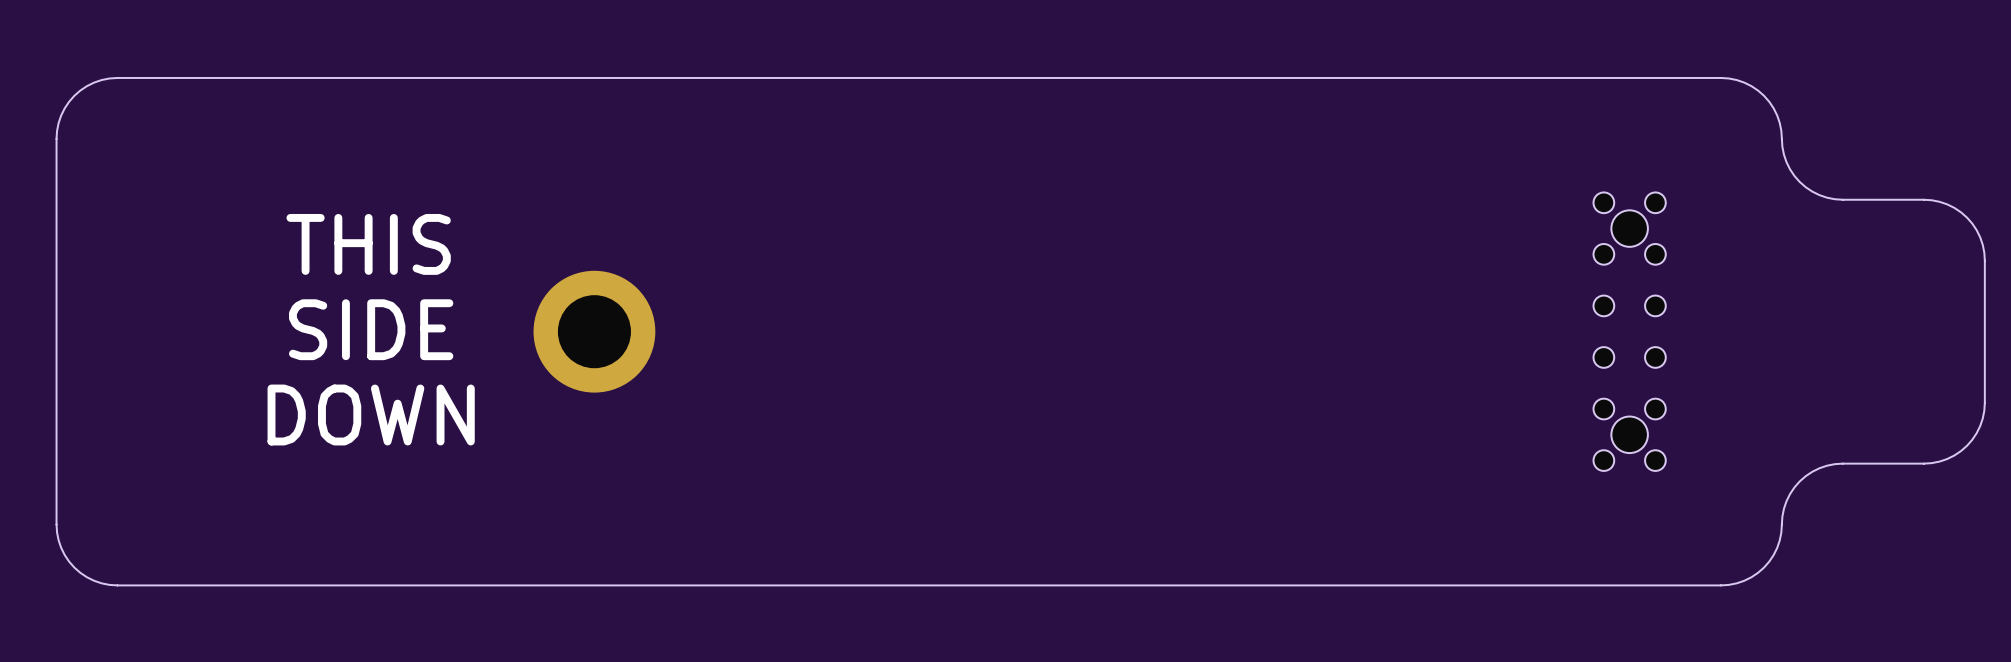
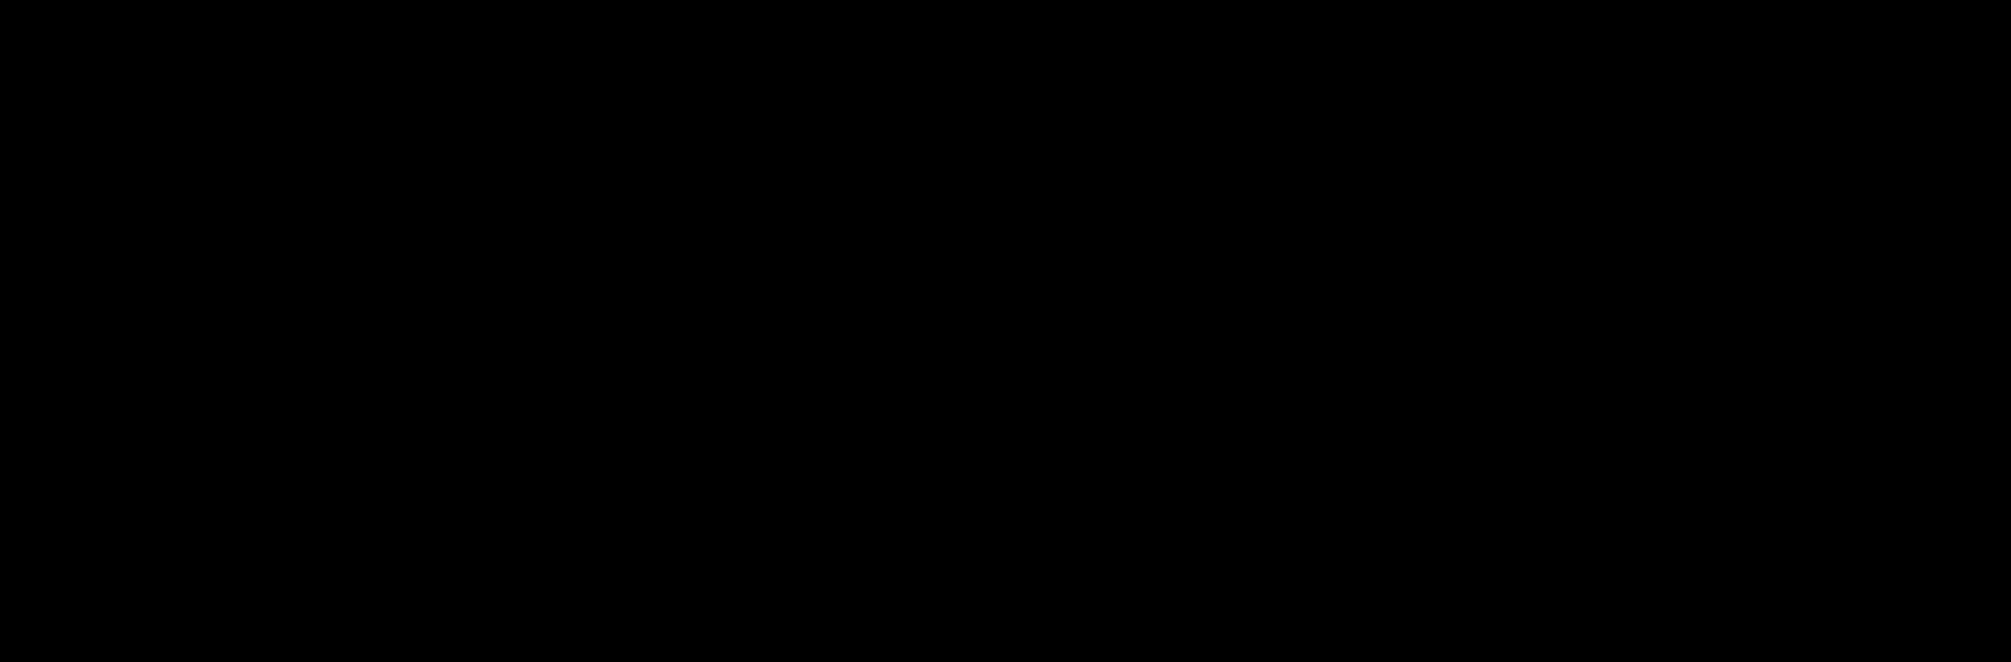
board edge: (1720, 77) (117, 77) (101, 80) (86, 86) (69, 101) (61, 115) (57, 130) (56, 524) (58, 540) (69, 561) (80, 572) (94, 580) (117, 585) (1720, 585) (1736, 583) (1758, 572) (1769, 561) (1779, 540) (1786, 501) (1799, 481) (1812, 471) (1834, 464) (1923, 463) (1939, 461) (1954, 455) (1972, 439) (1980, 426) (1984, 410) (1984, 260) (1982, 244) (1976, 230) (1961, 212) (1947, 204) (1923, 199) (1834, 199) (1819, 195) (1805, 187) (1794, 175) (1786, 162) (1779, 123) (1769, 101) (1751, 86) (1736, 80) (1720, 77) -> none
text: THIS (368, 244) -> none
text: SIDE (371, 329) -> none
via: (594, 331) -> none
part: (1629, 331) -> none
text: DOWN (371, 415) -> none

